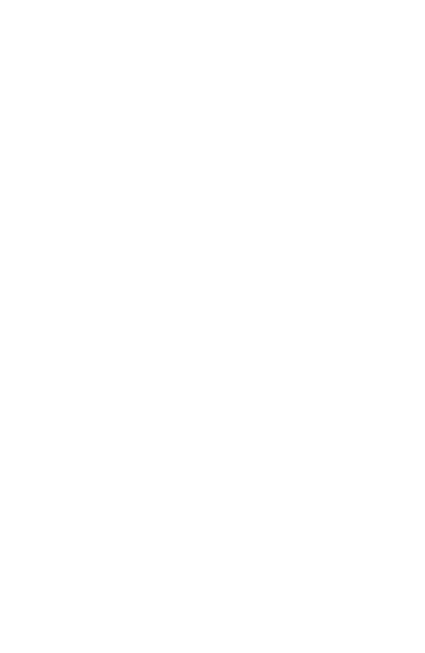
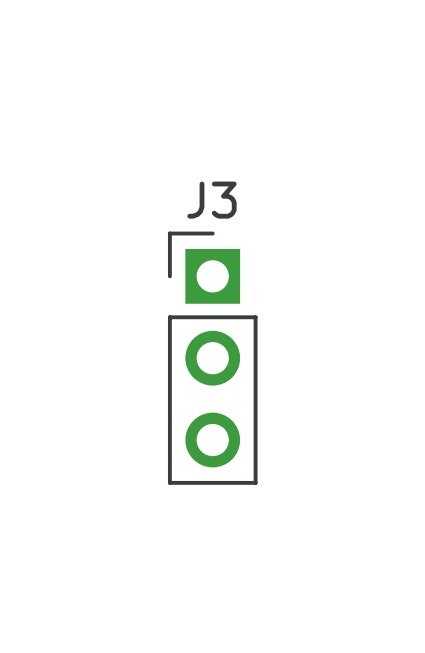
J3: none -> (212, 358)

